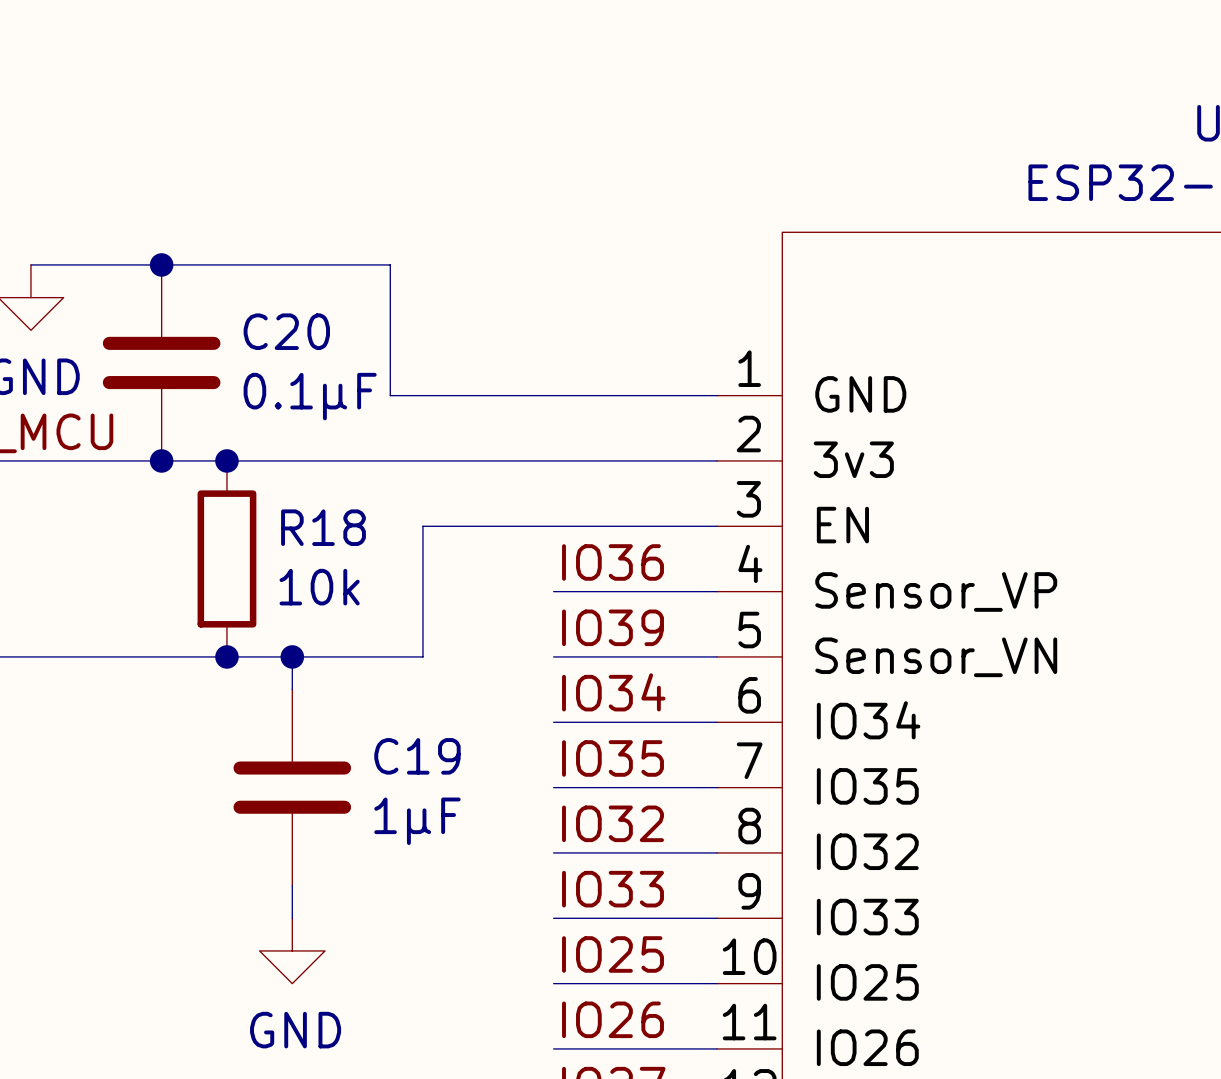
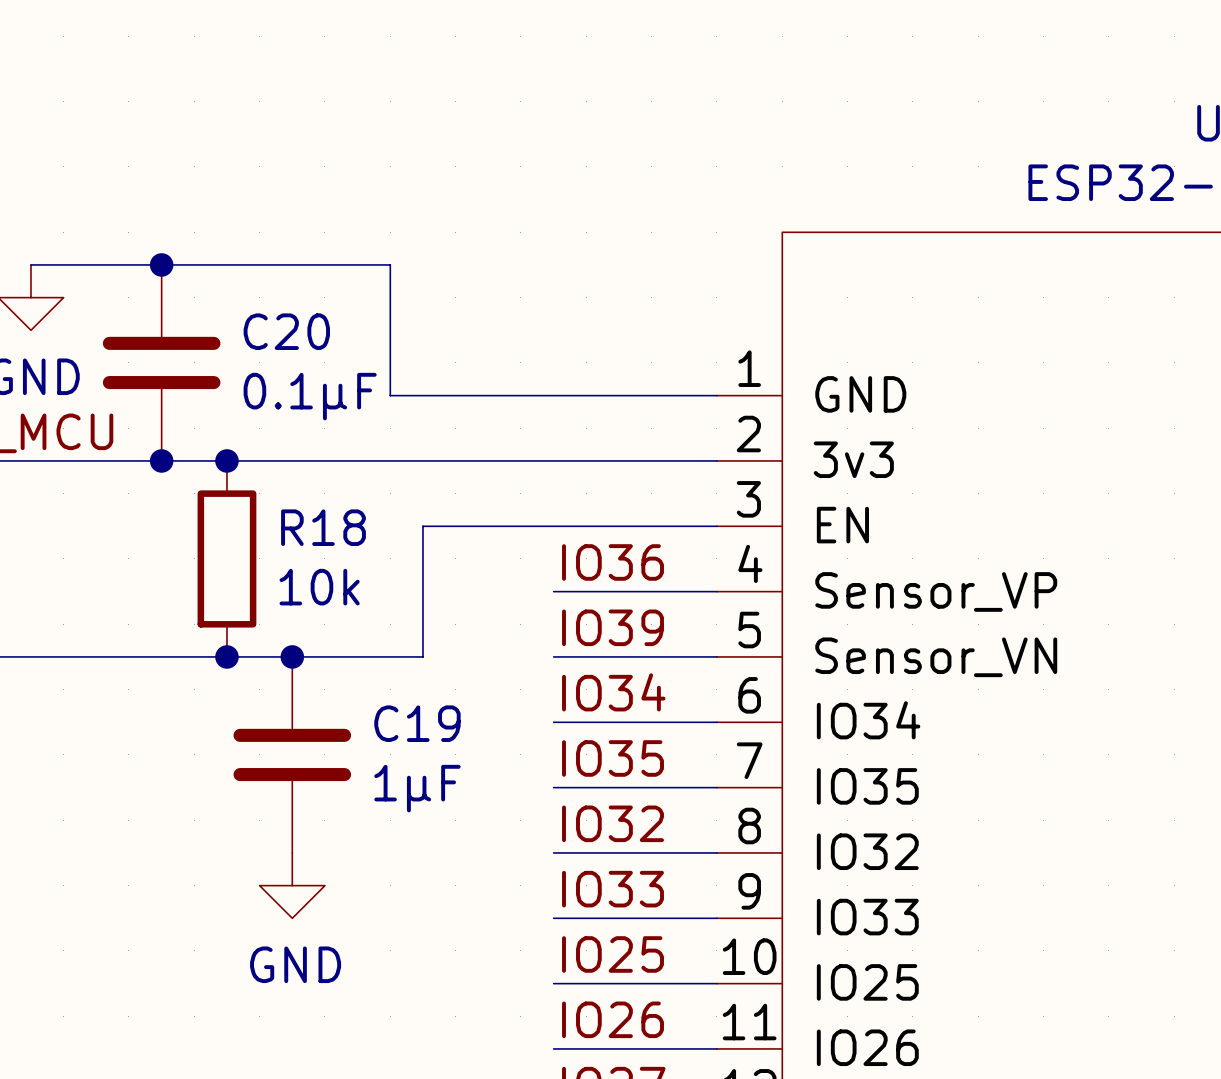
C19 position: (292, 787) -> (292, 754)
wire: (292, 885) (292, 918) -> none
power symbol position: GND (292, 950) -> GND (292, 885)

